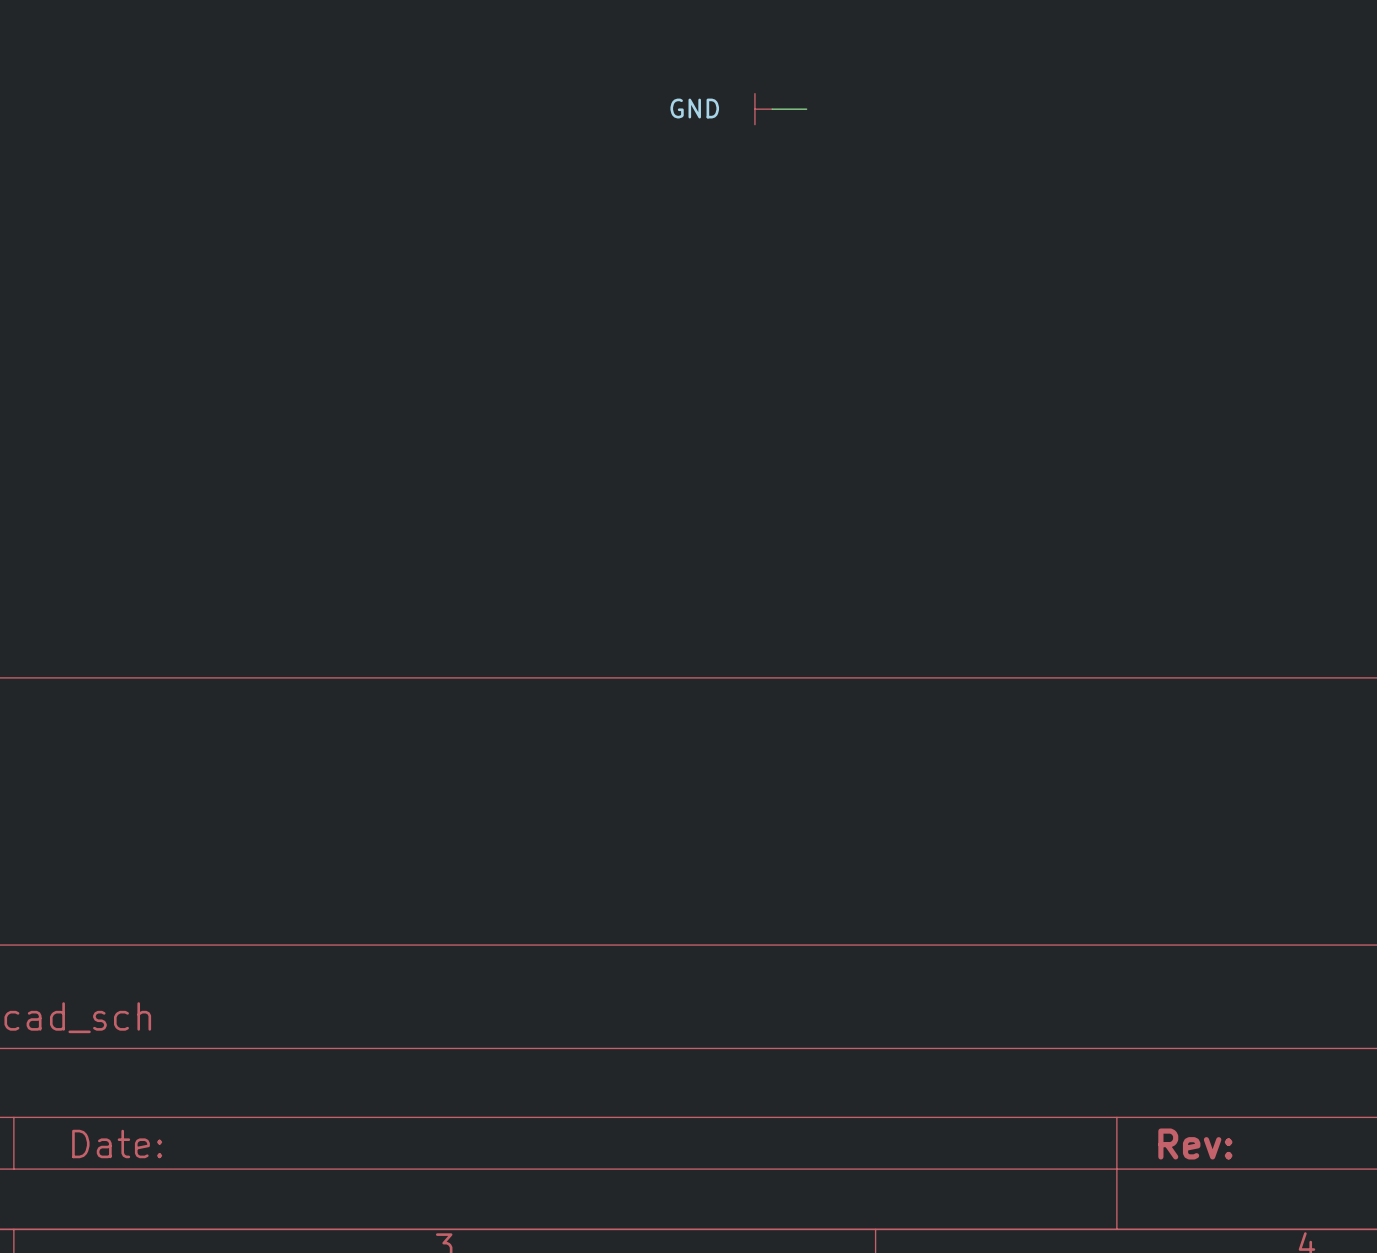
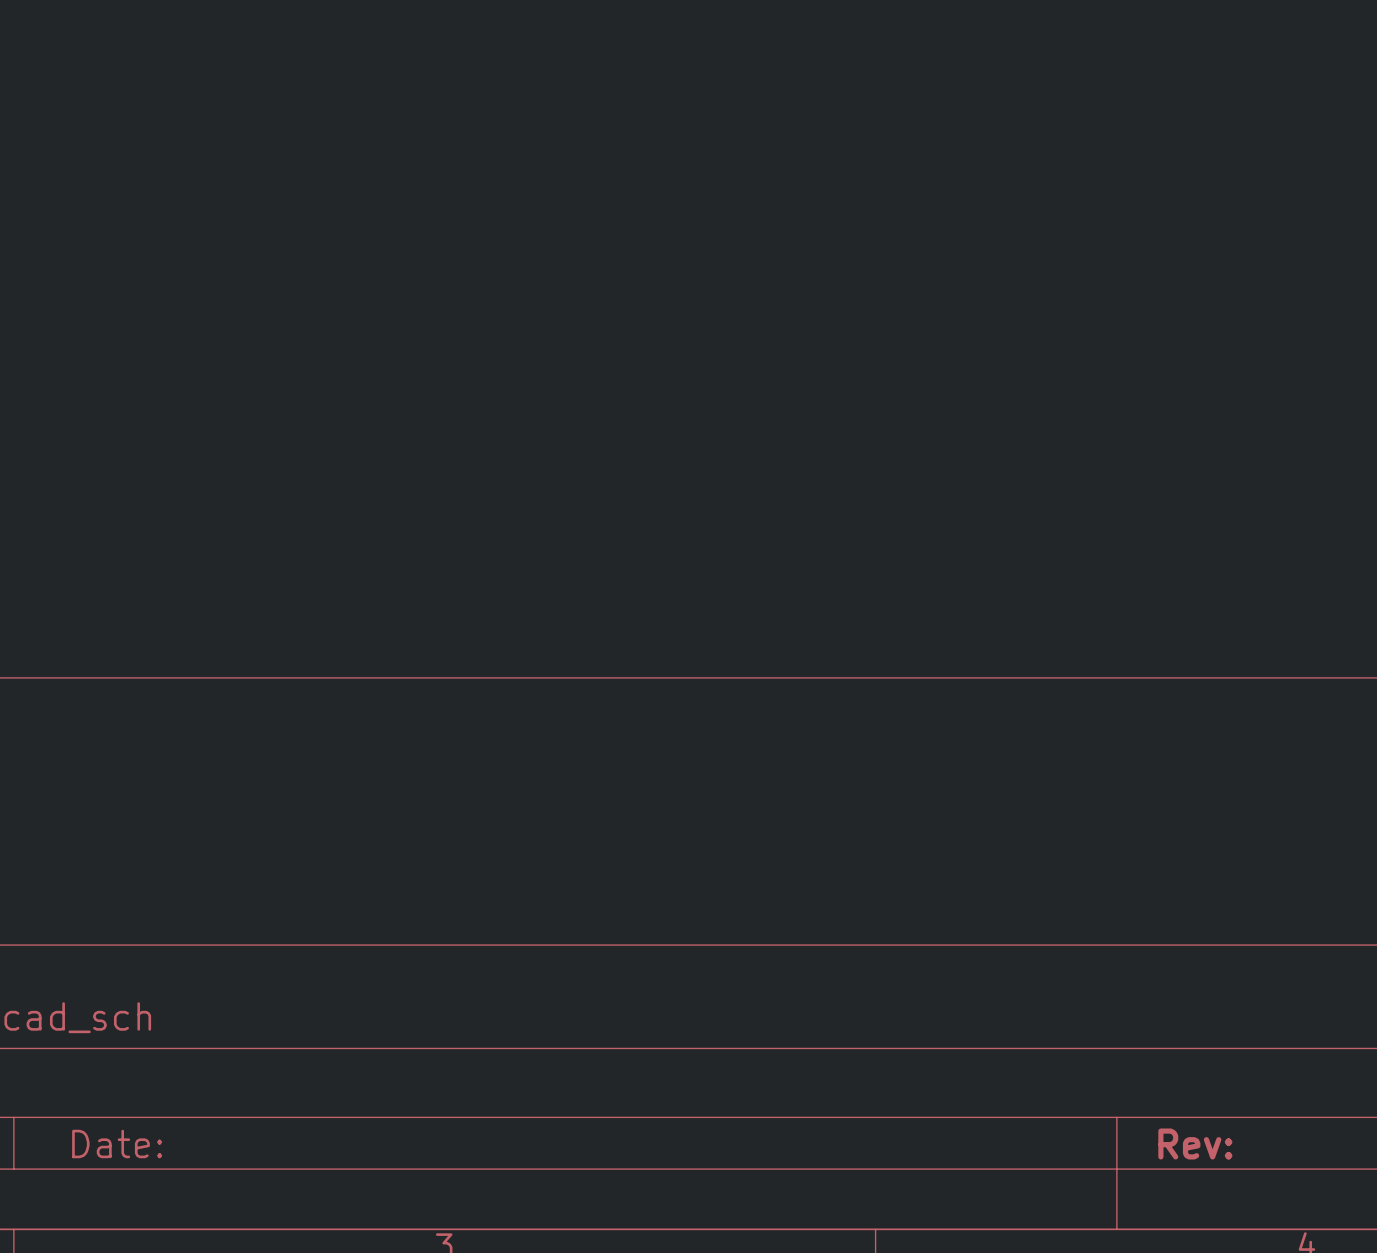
power symbol: GND (763, 109) -> none
wire: (772, 109) (806, 109) -> none

